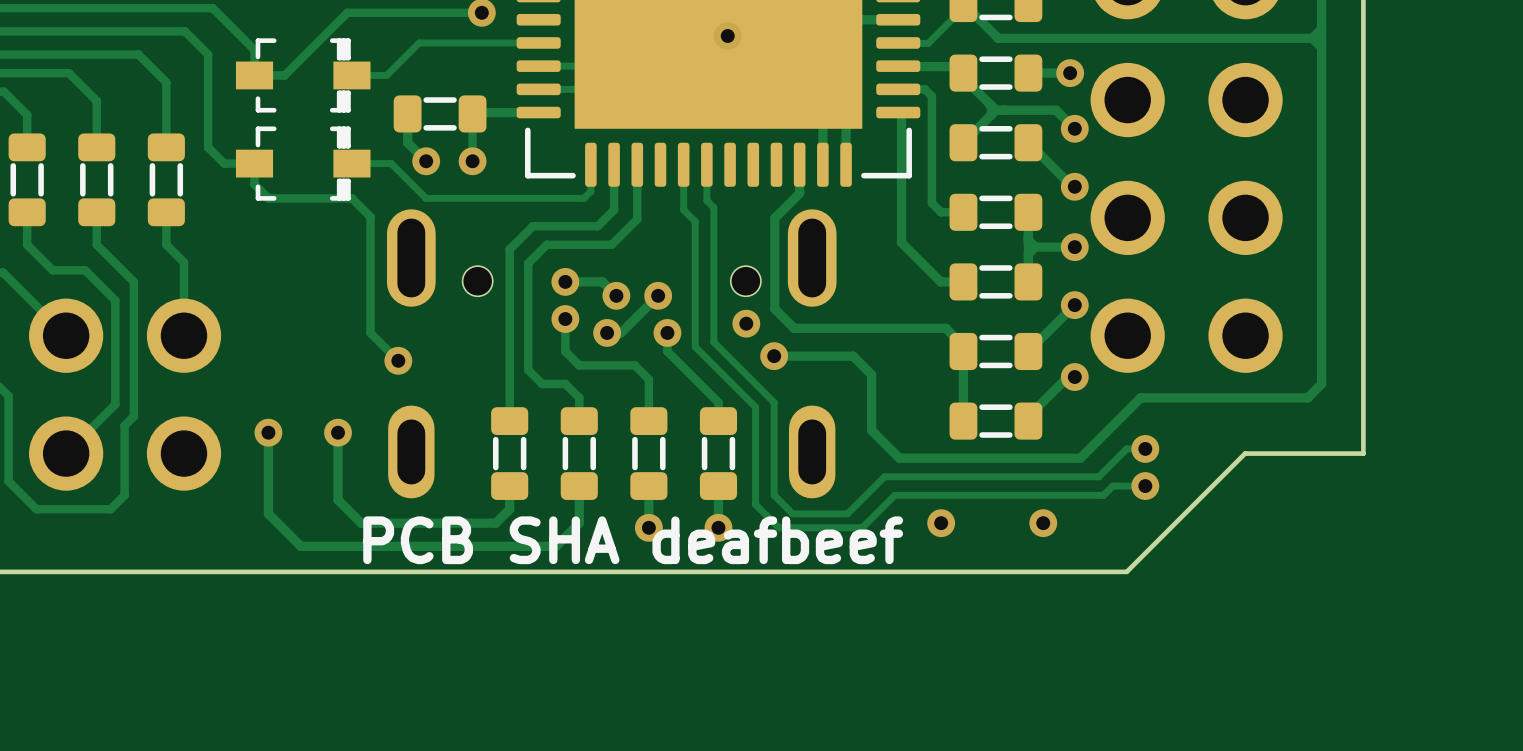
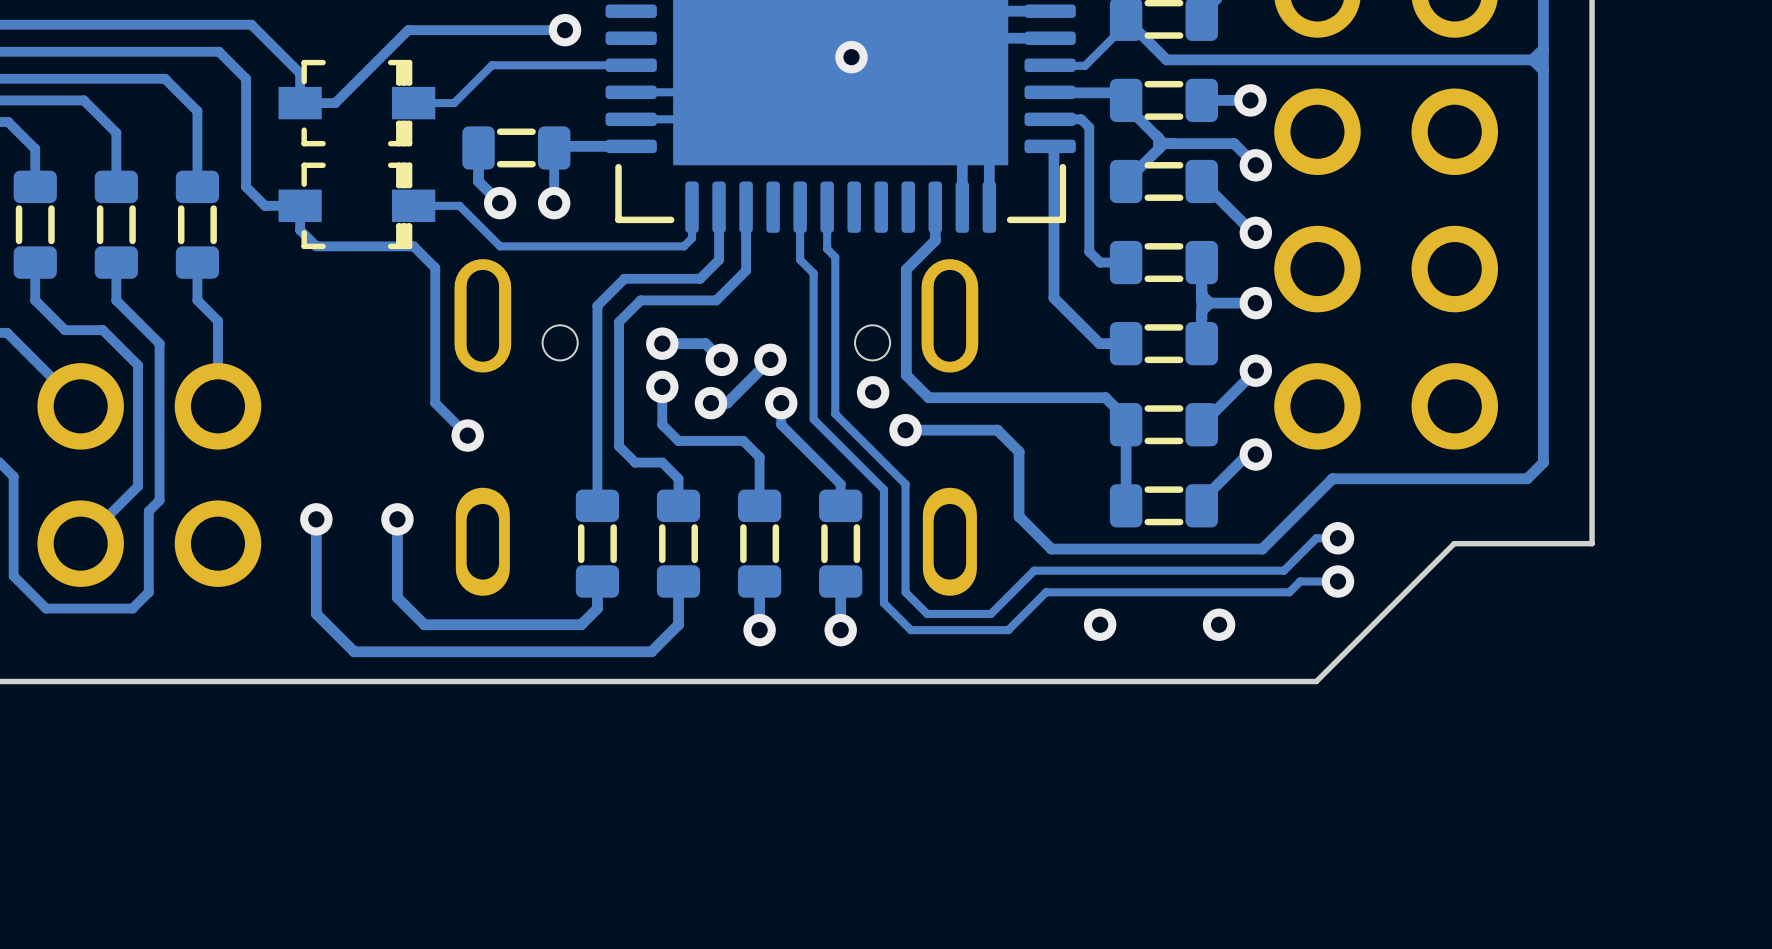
text: PCB SHA deafbeef (633, 540) -> none

